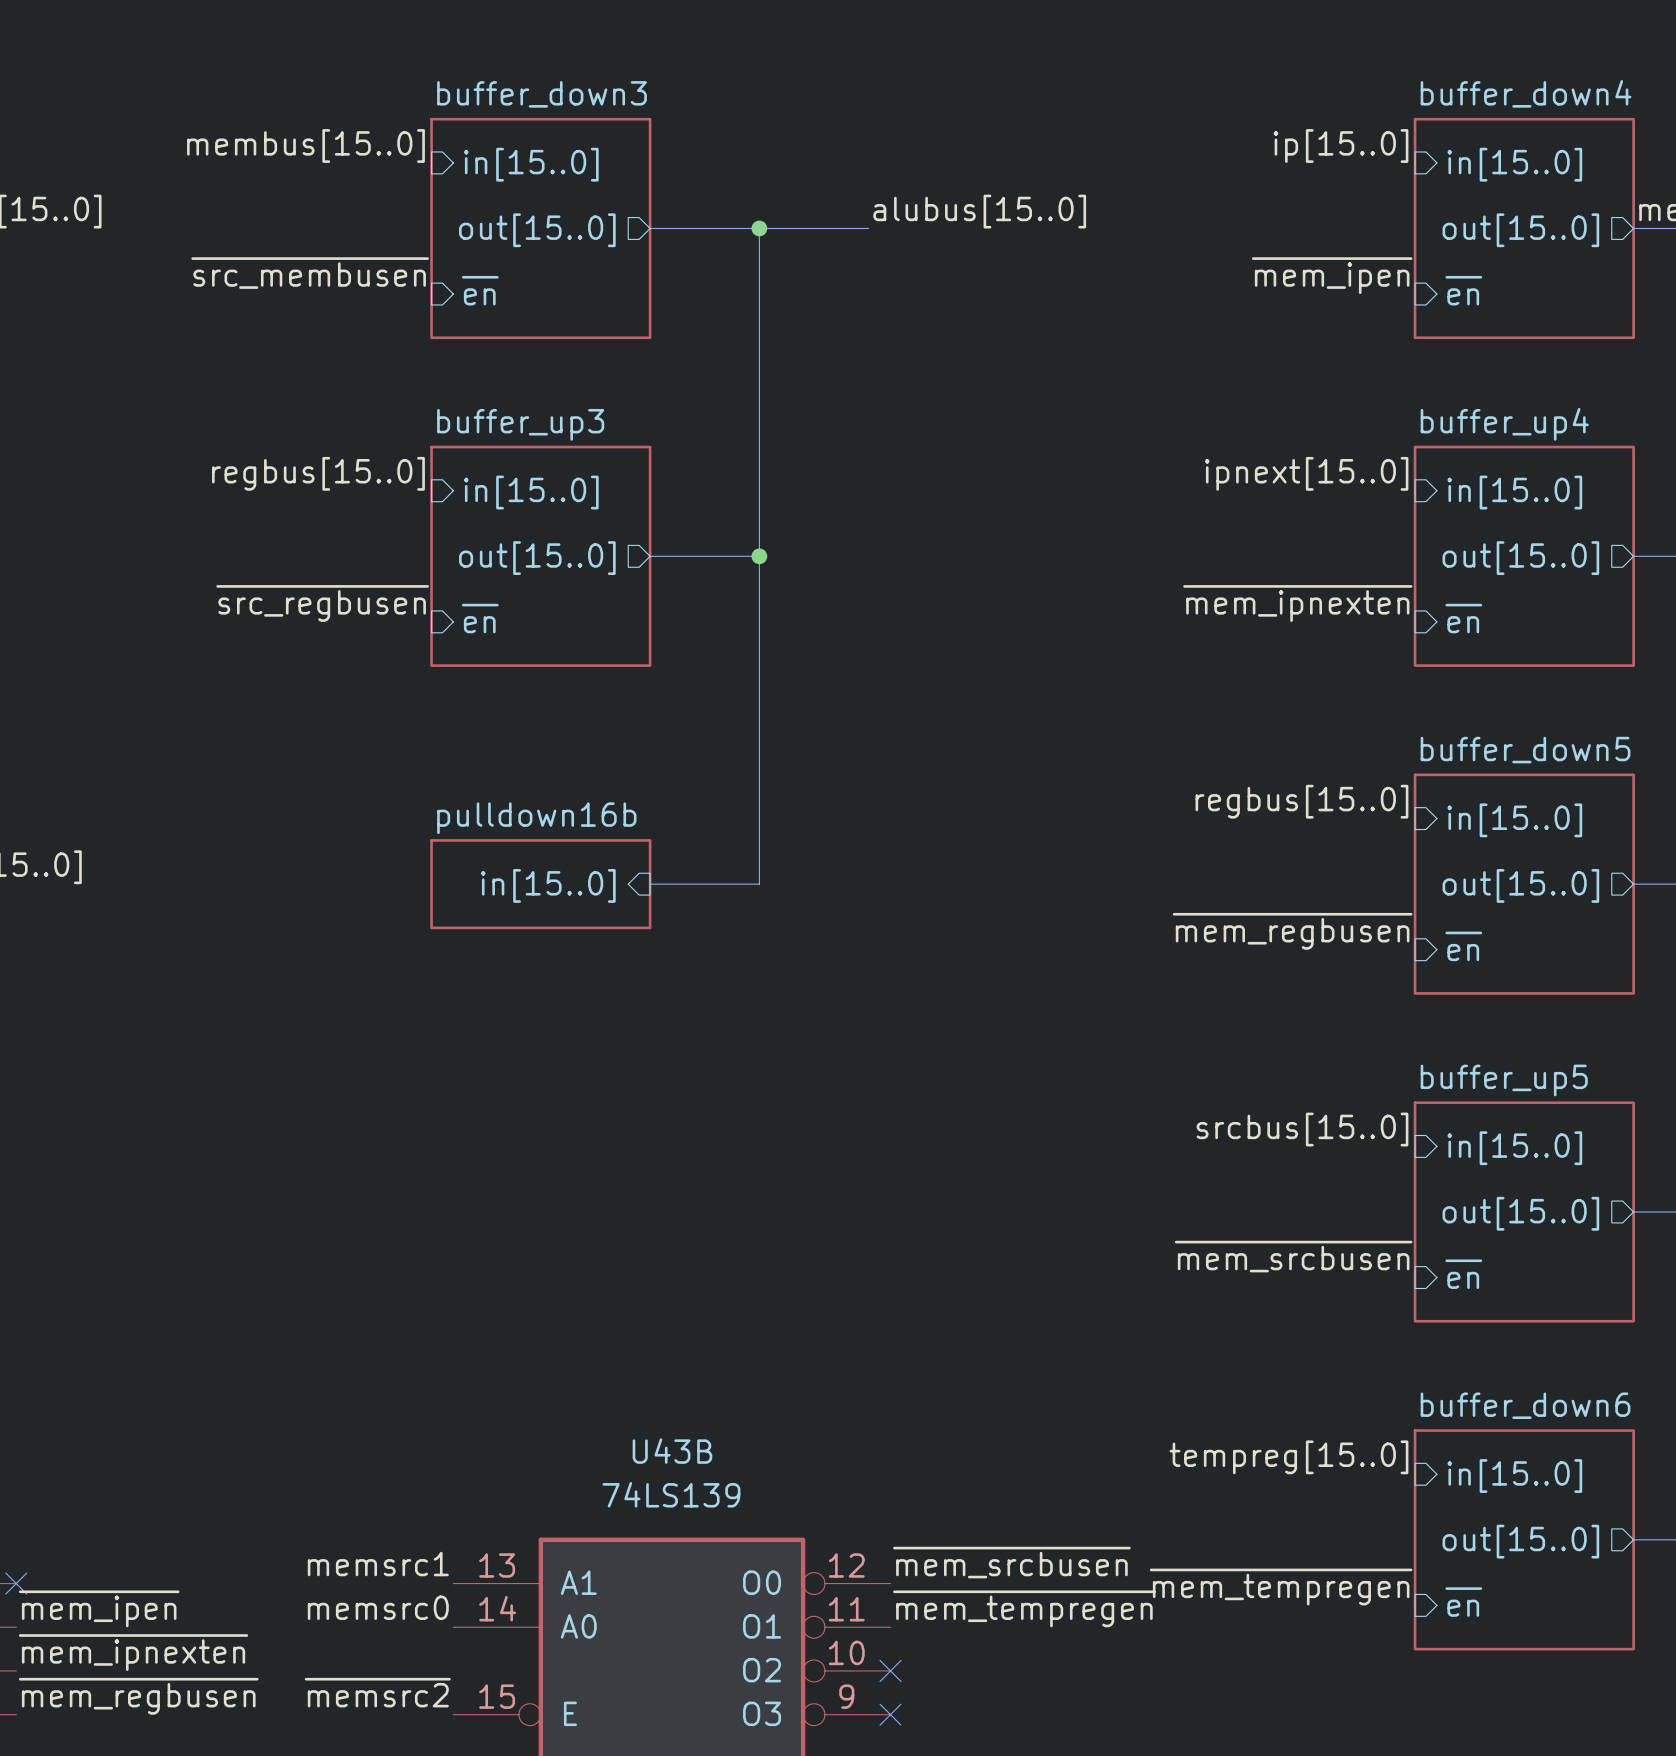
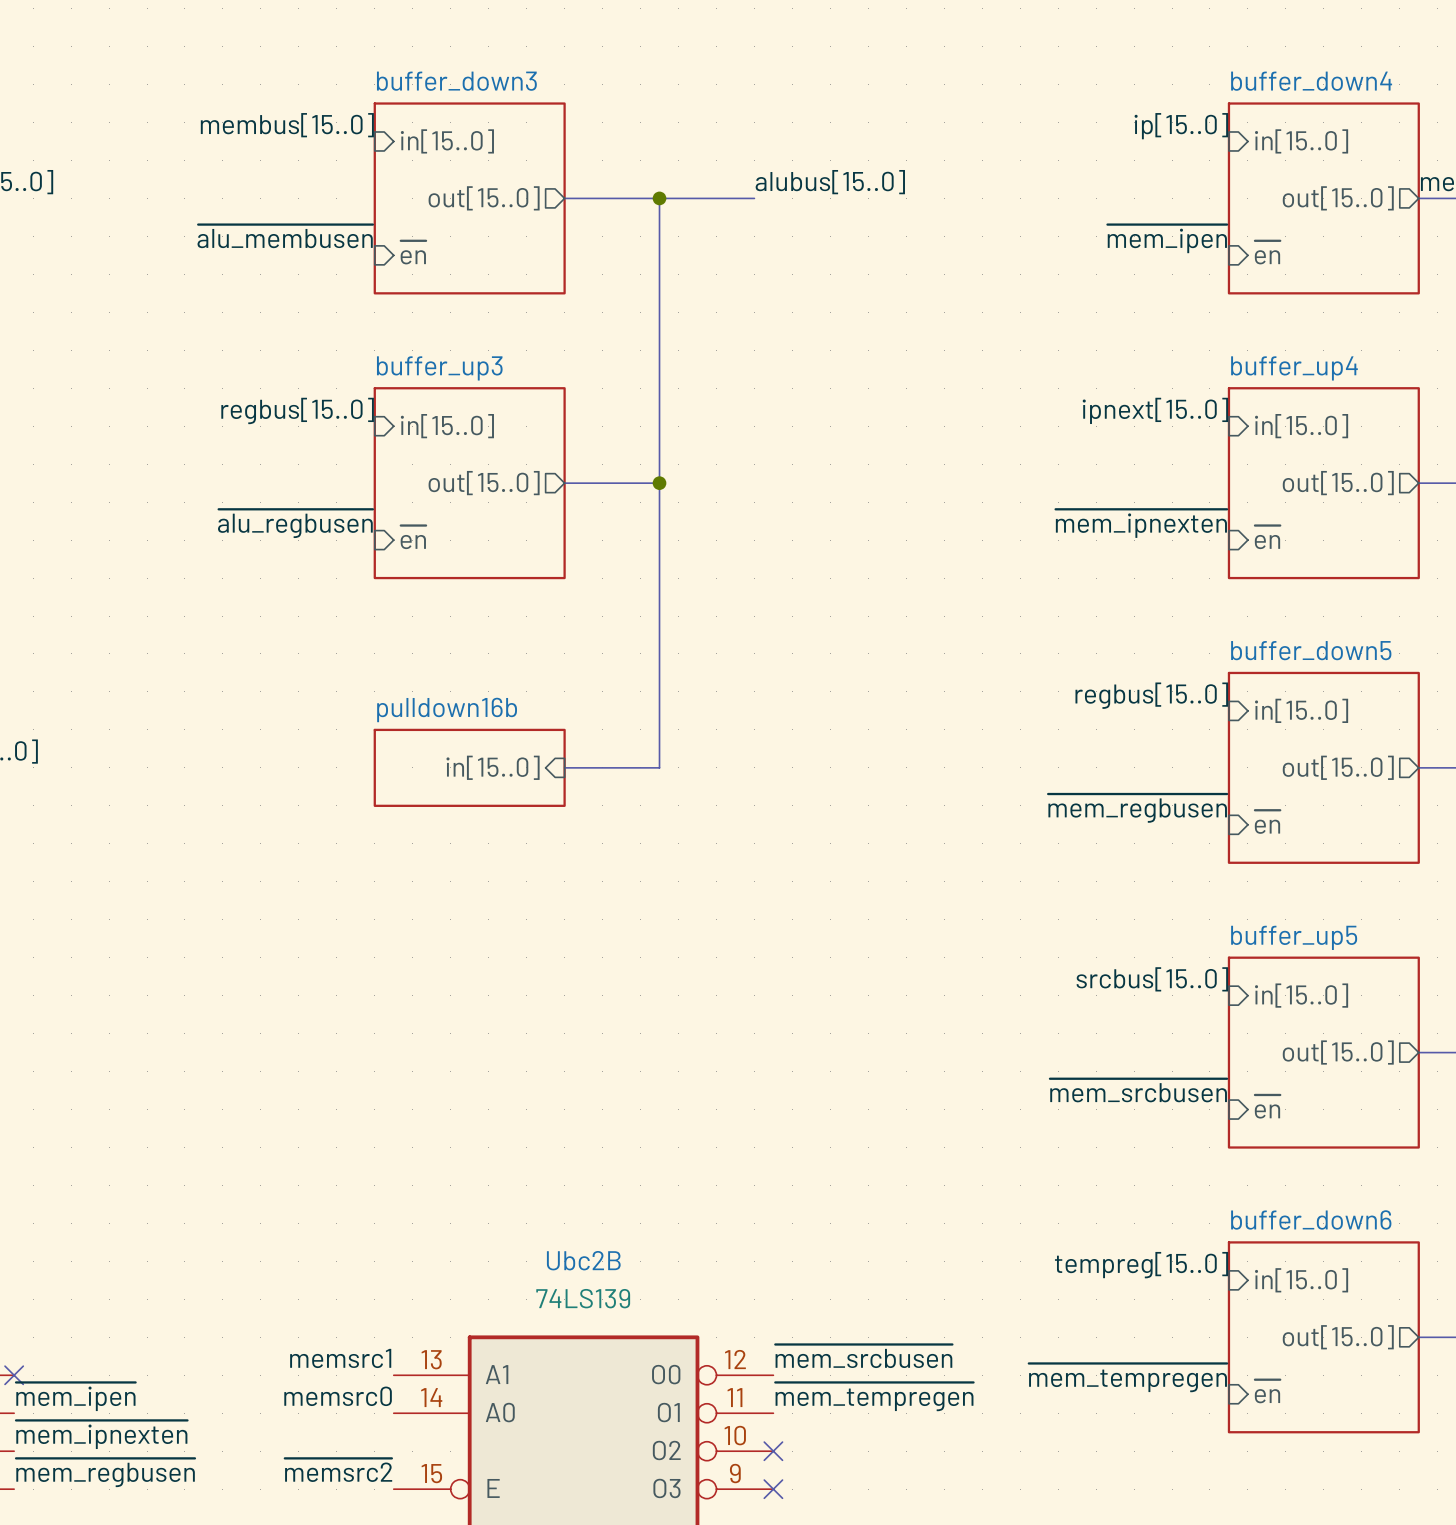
label: ~{src_membusen} (310, 273) -> ~{alu_membusen} (285, 236)
label: ~{src_regbusen} (322, 603) -> ~{alu_regbusen} (295, 523)
U43B name: U43B (672, 1451) -> Ubc2B (583, 1260)

